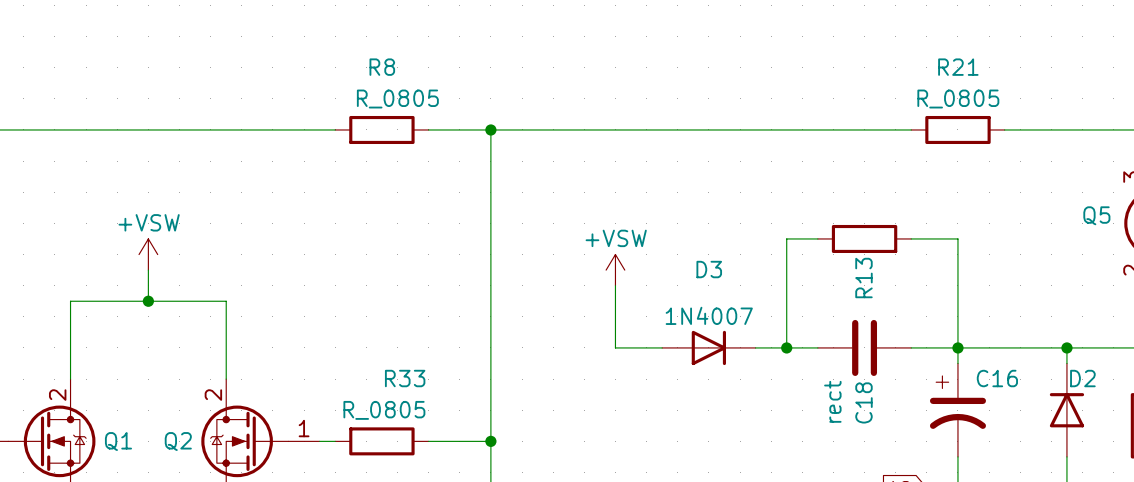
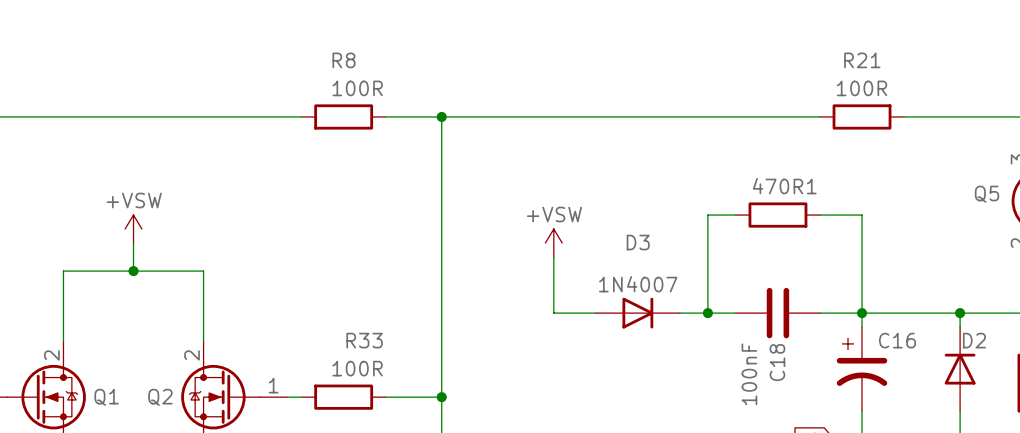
R8 value: R_0805 (397, 99) -> 100R (357, 88)
R21 value: R_0805 (958, 99) -> 100R (862, 88)
R13 name: R13 (863, 278) -> 470R1 (784, 186)
C18 value: rect (832, 401) -> 100nF (749, 374)
R33 value: R_0805 (384, 410) -> 100R (357, 368)

